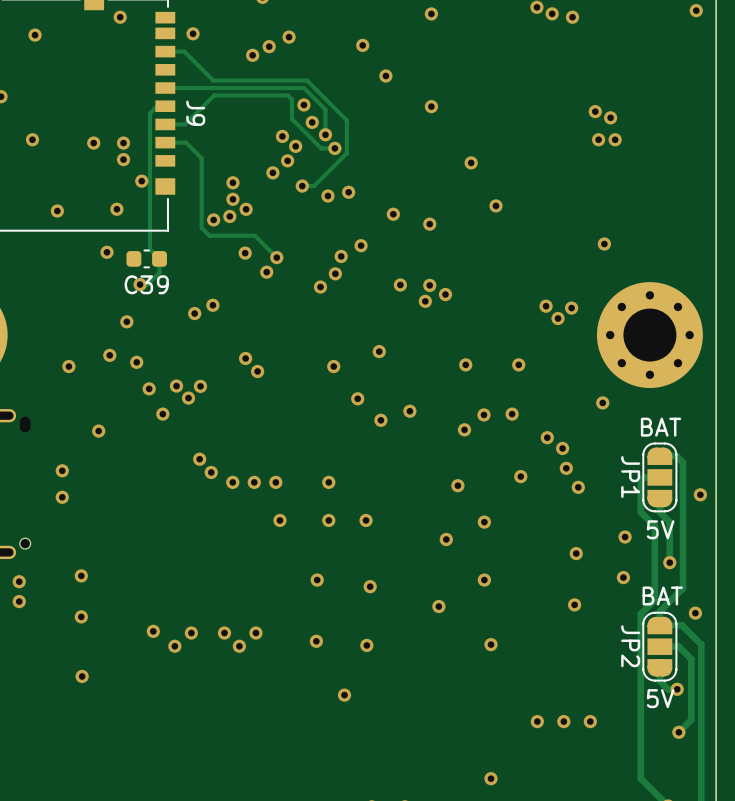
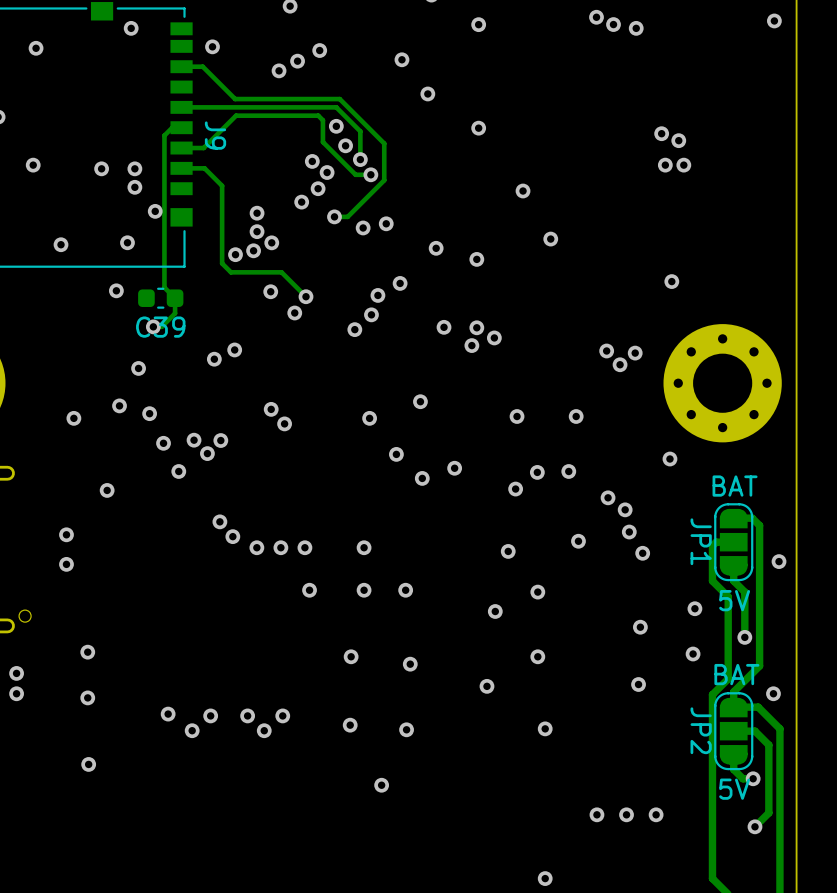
via: (19, 581) -> none
via: none -> (16, 673)
via: (19, 601) -> none
via: none -> (16, 693)

